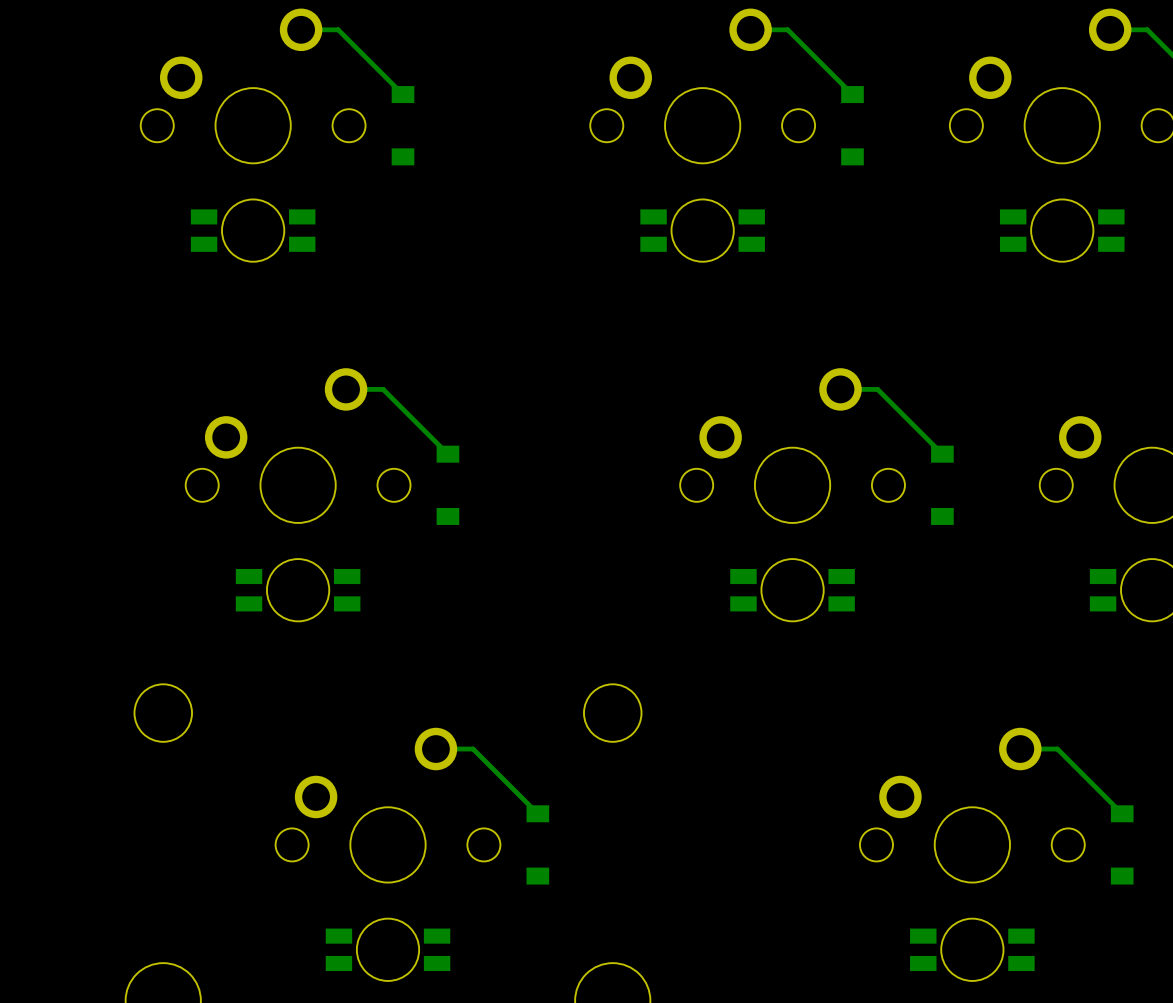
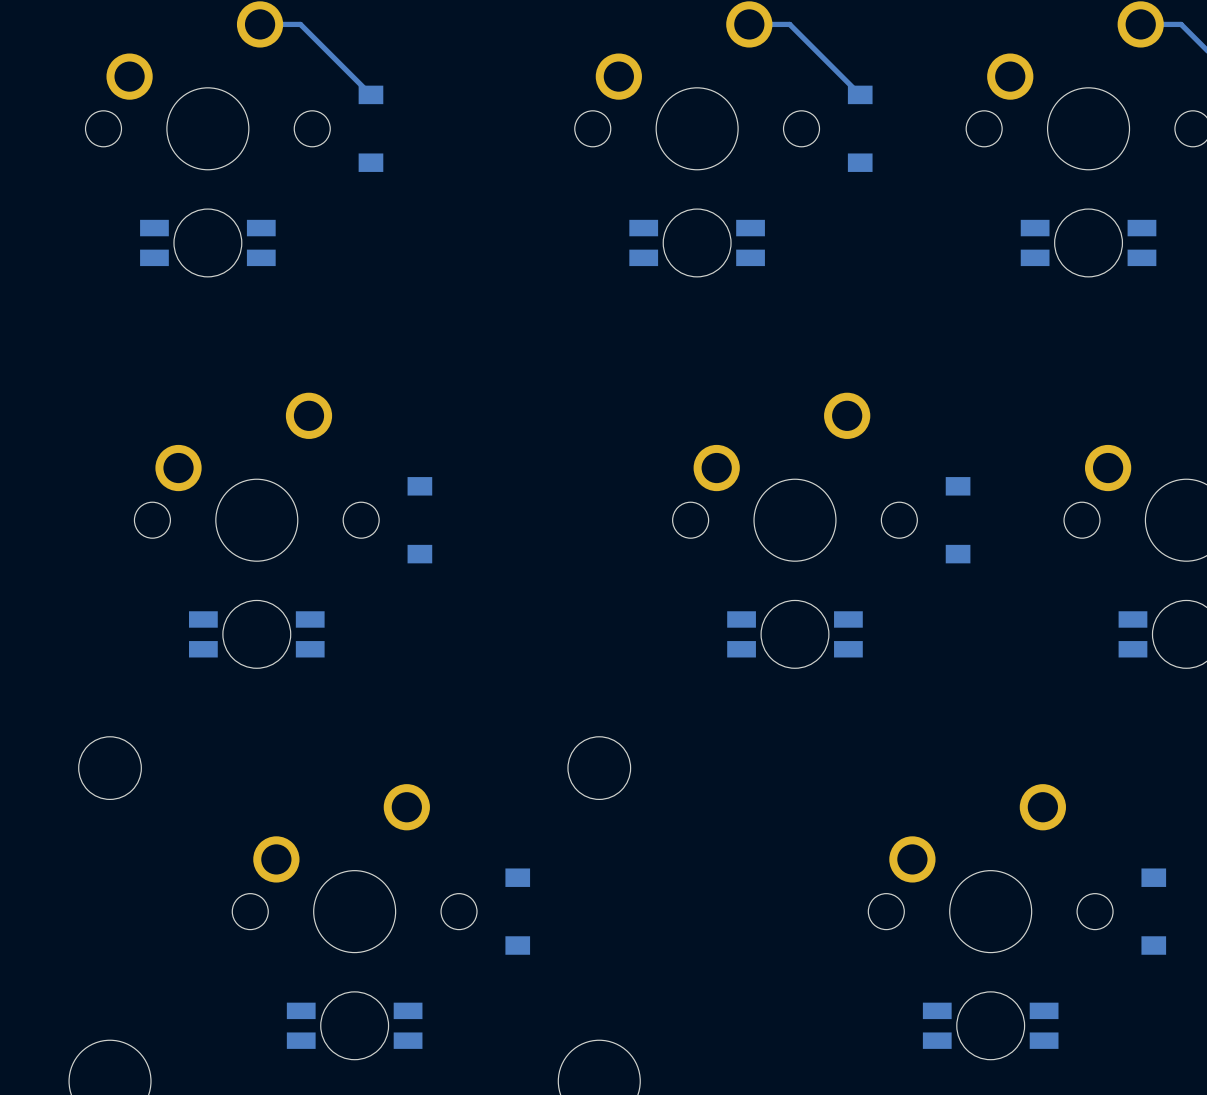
bottom track: (346, 389) (383, 389) (447, 454) -> none
bottom track: (840, 389) (877, 389) (942, 454) -> none
bottom track: (435, 749) (473, 749) (537, 813) -> none
bottom track: (1020, 749) (1057, 749) (1122, 813) -> none

